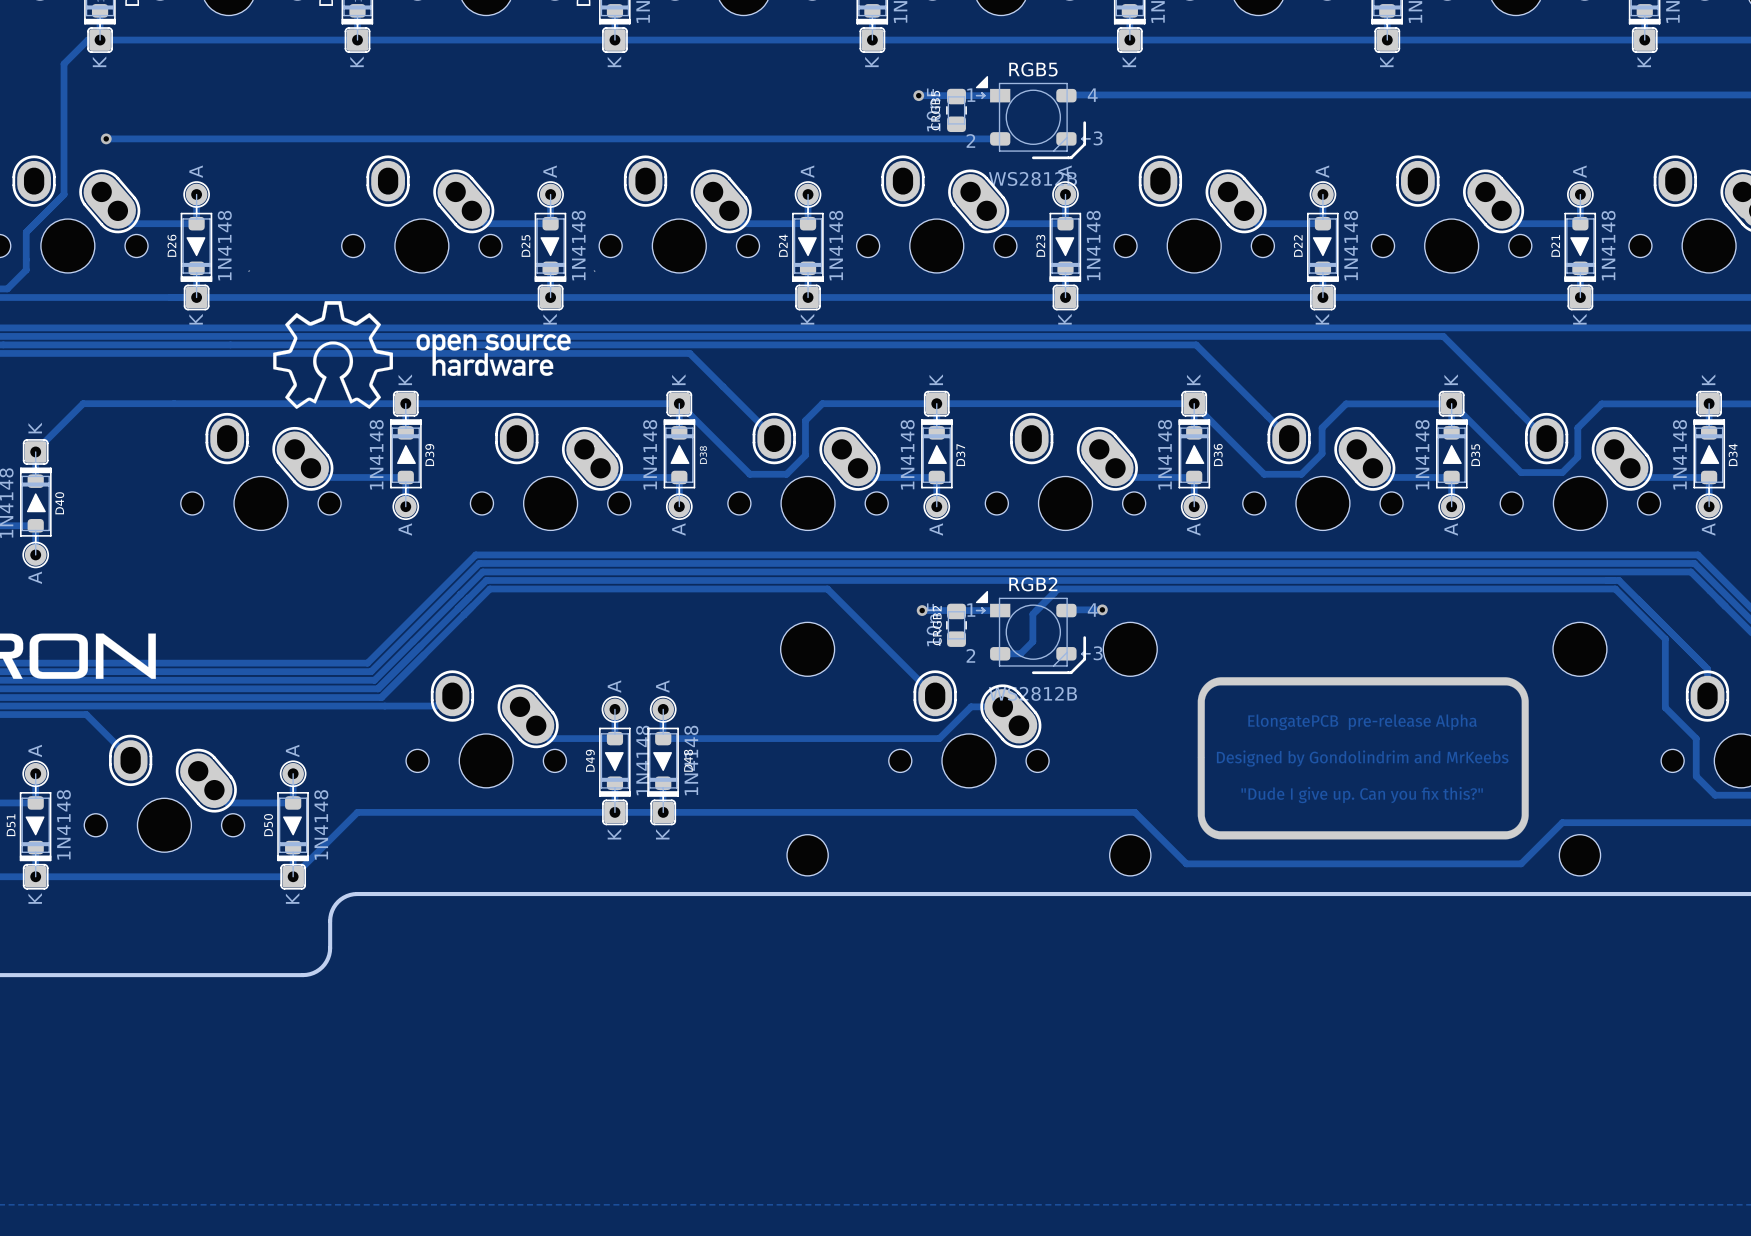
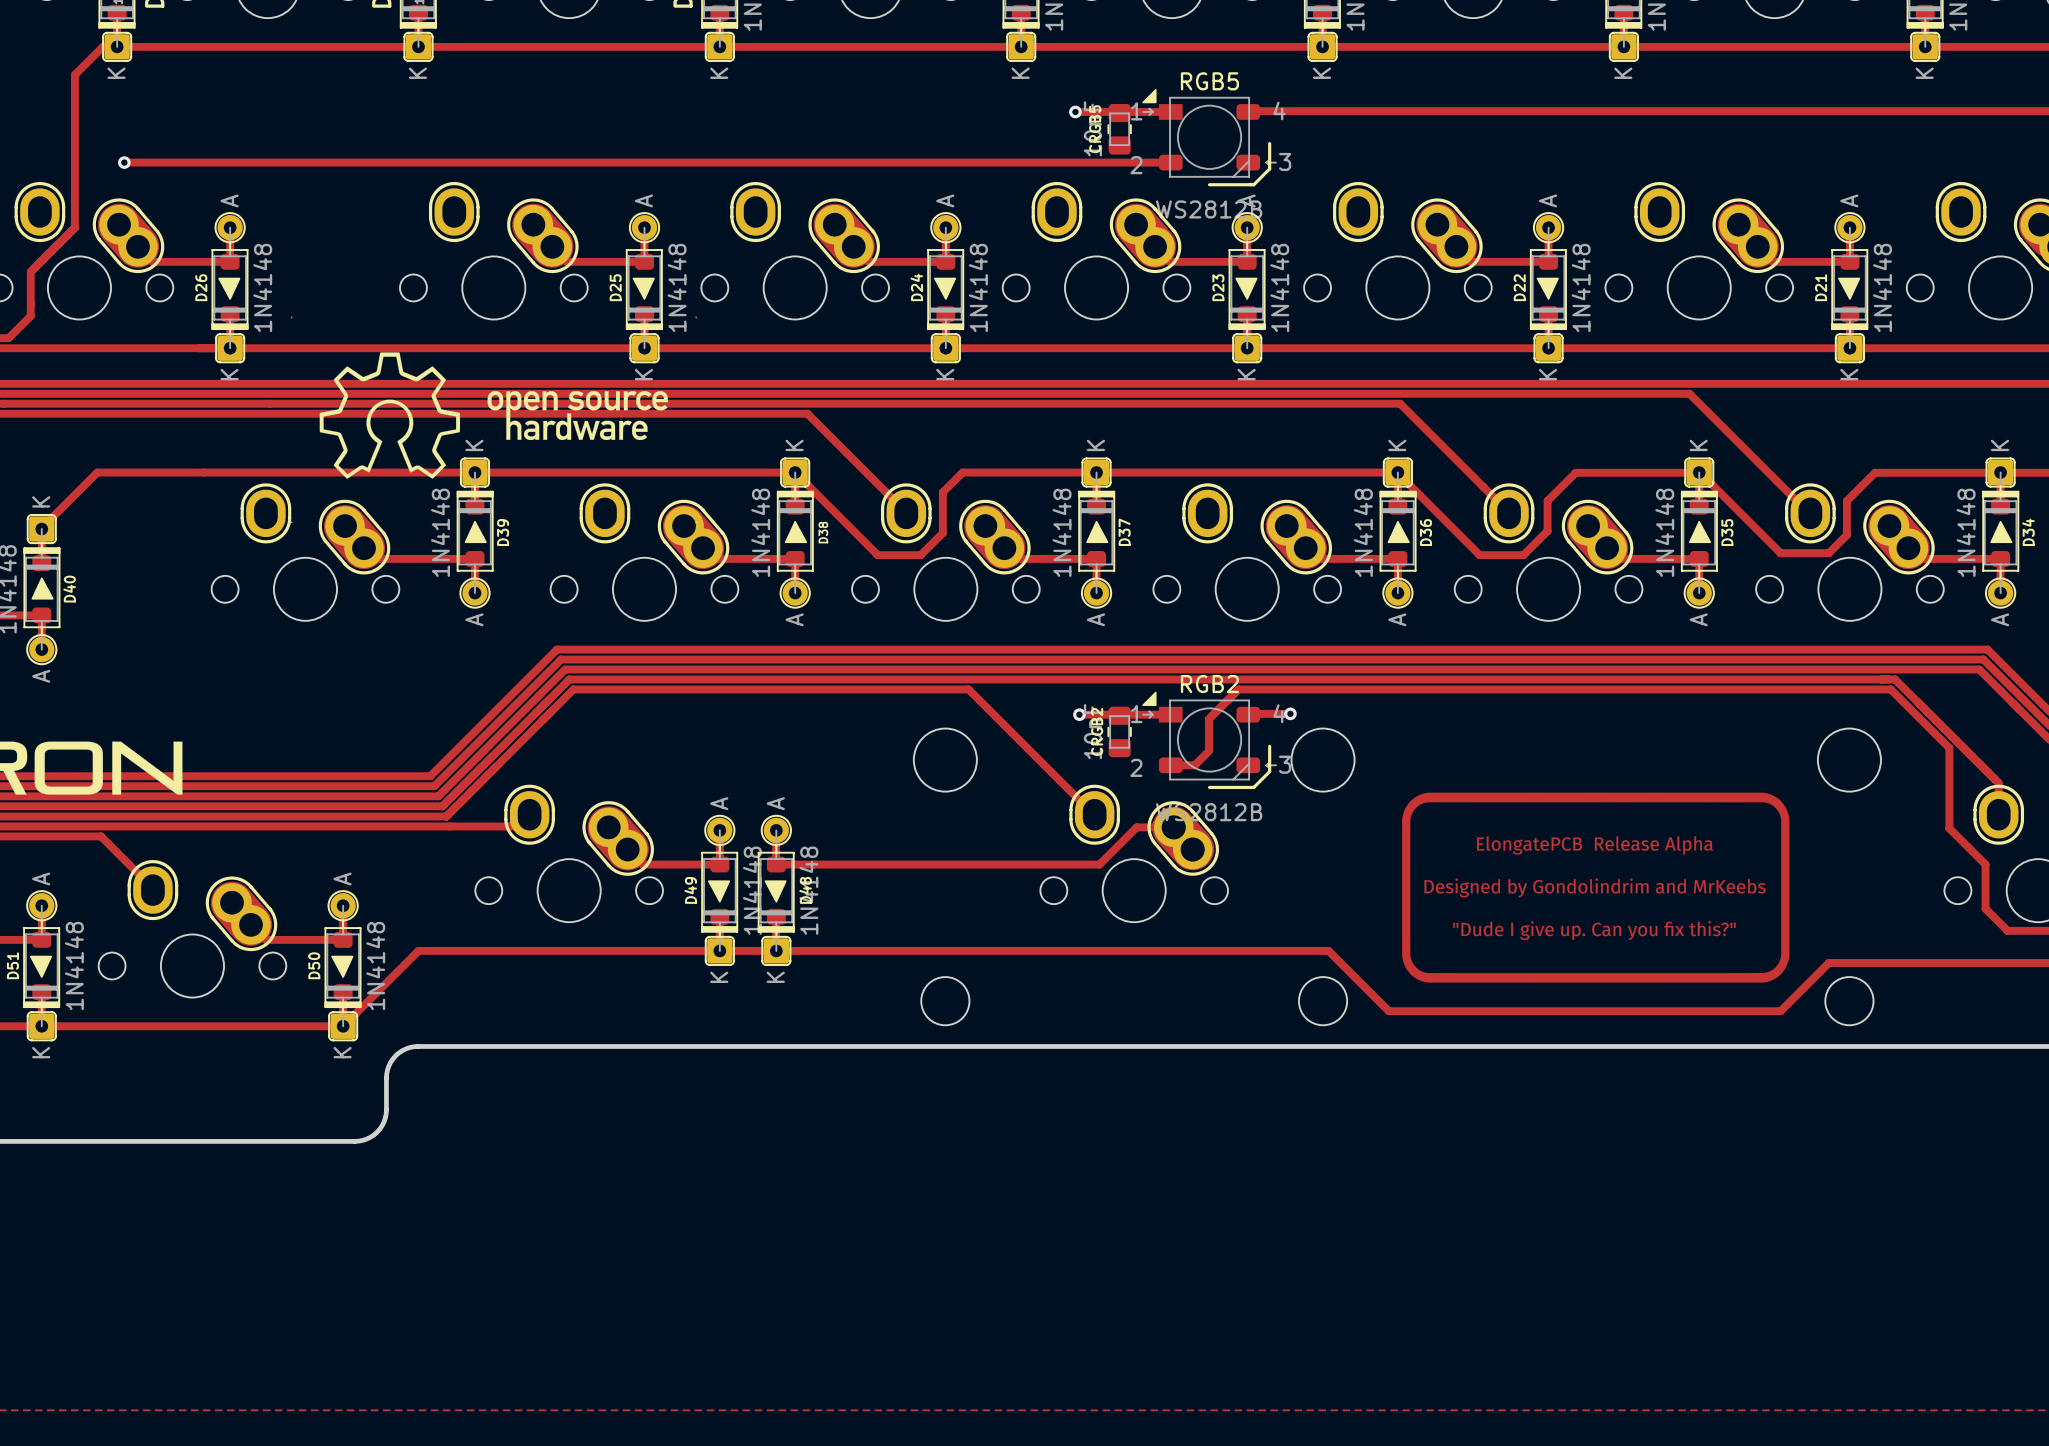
part footprint: [1197, 677, 1529, 840] -> [1402, 792, 1790, 983]

